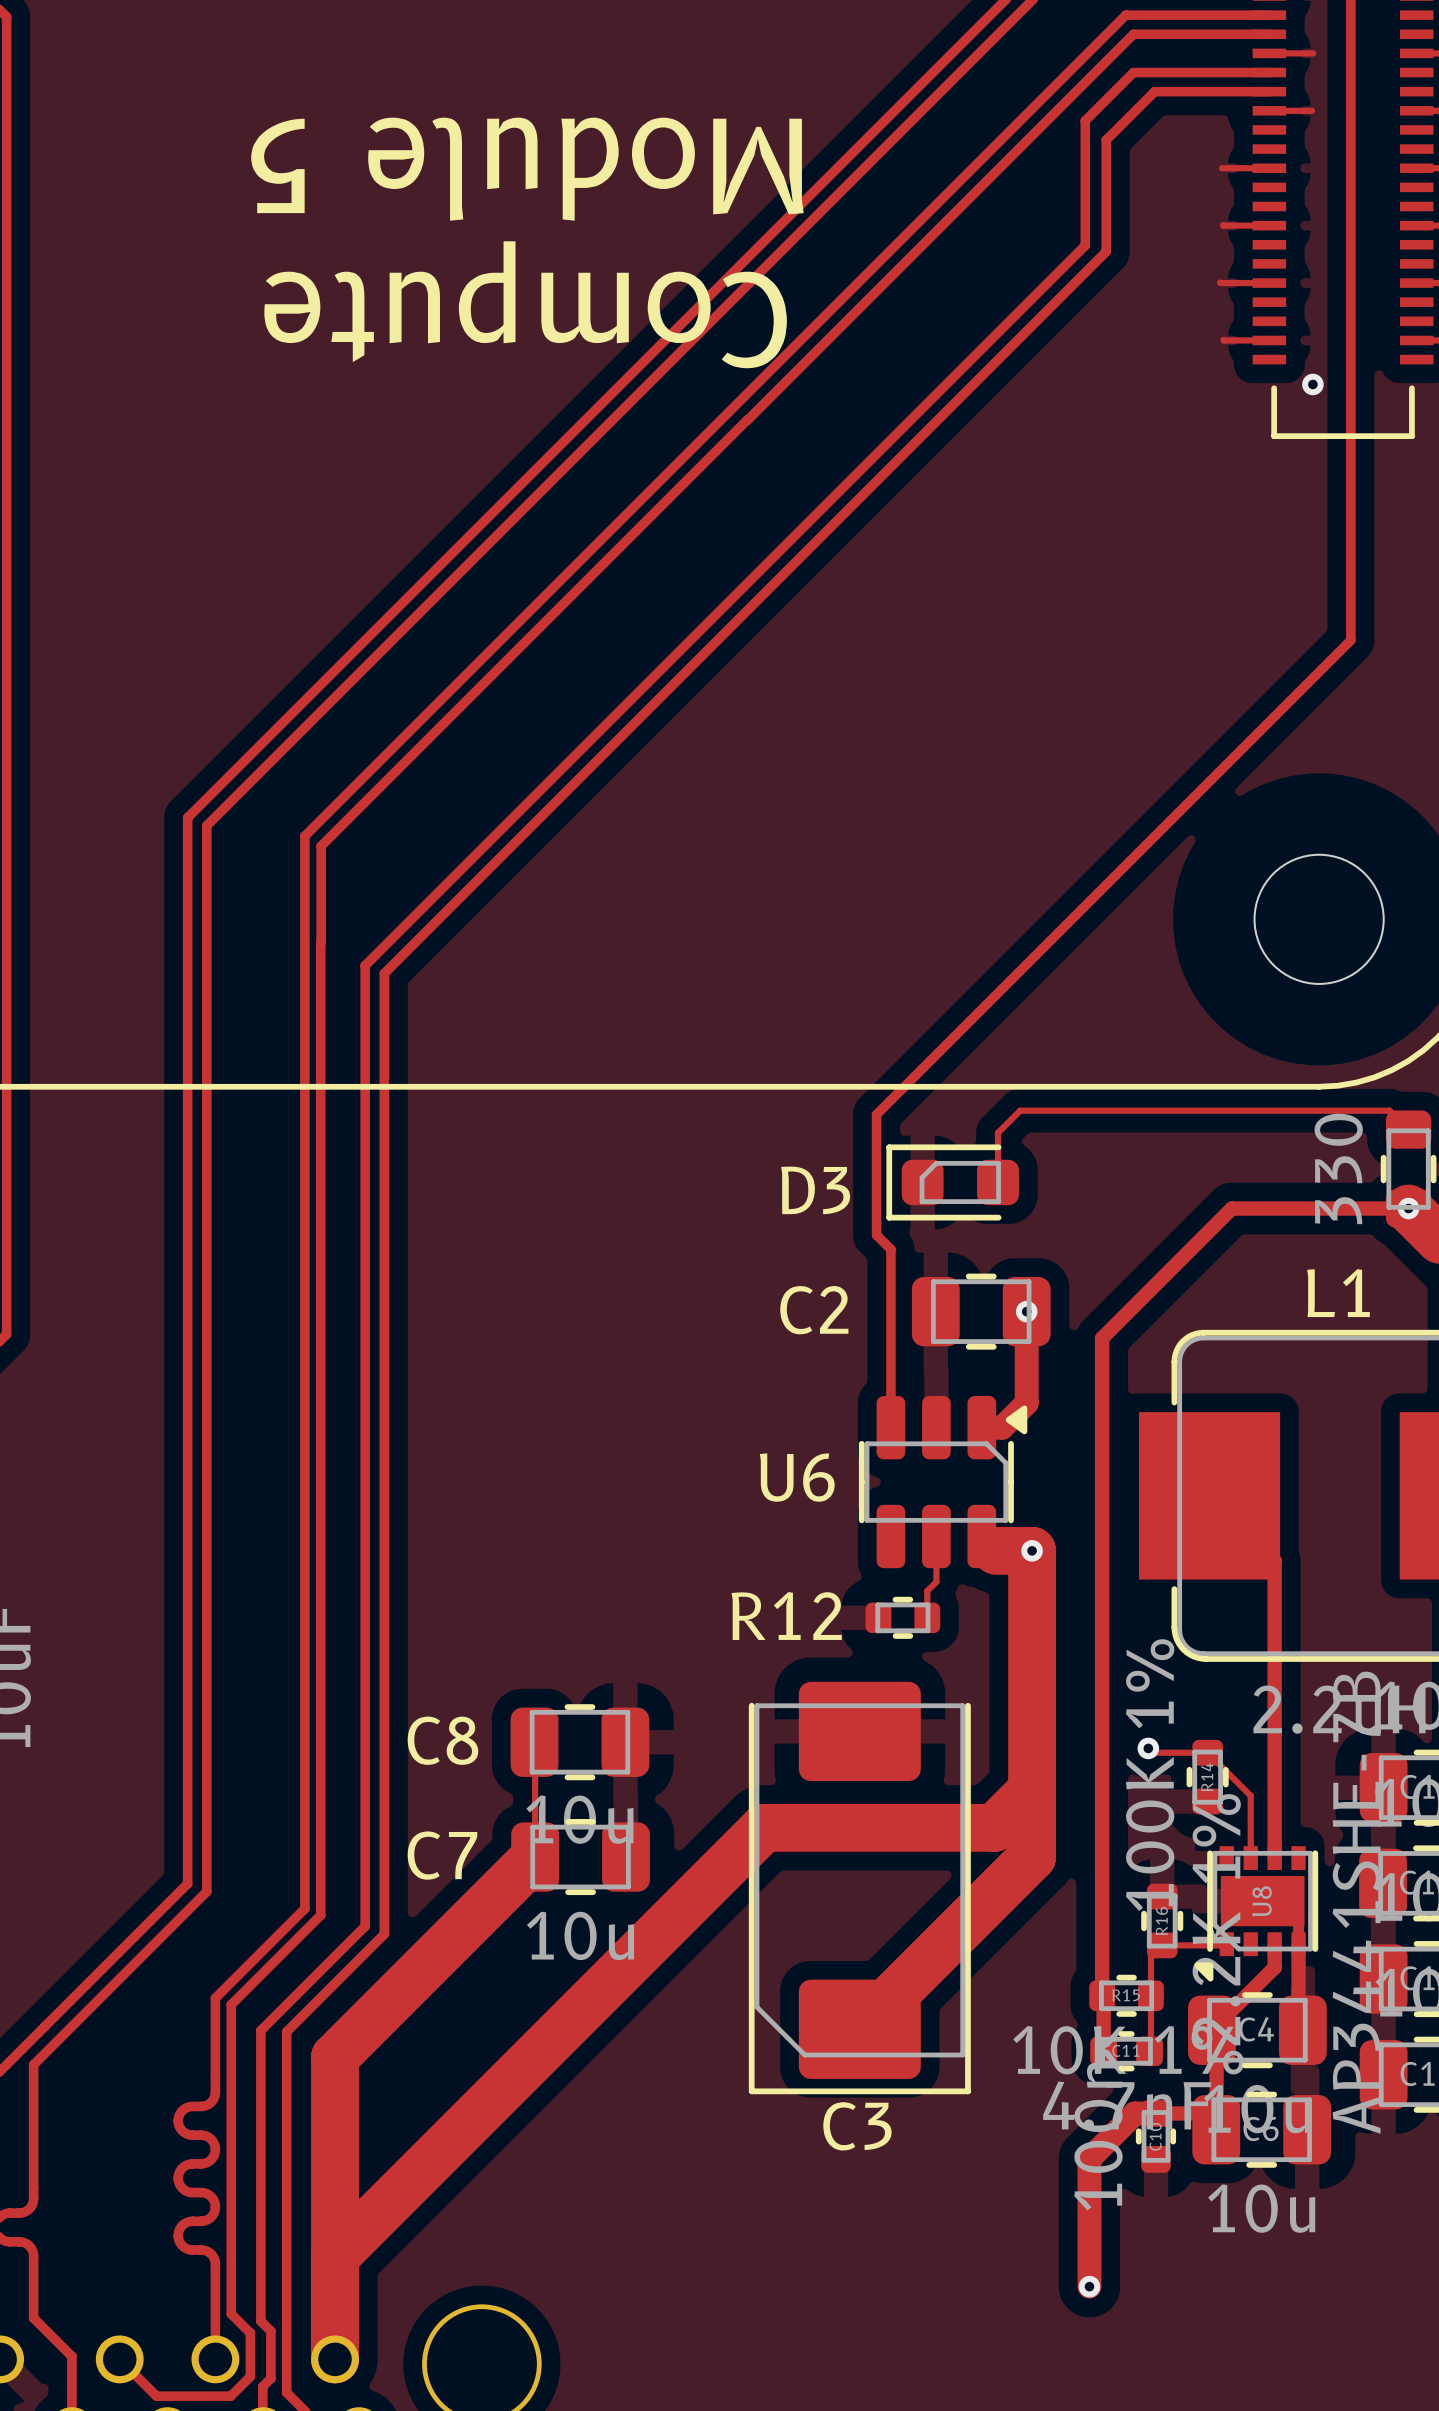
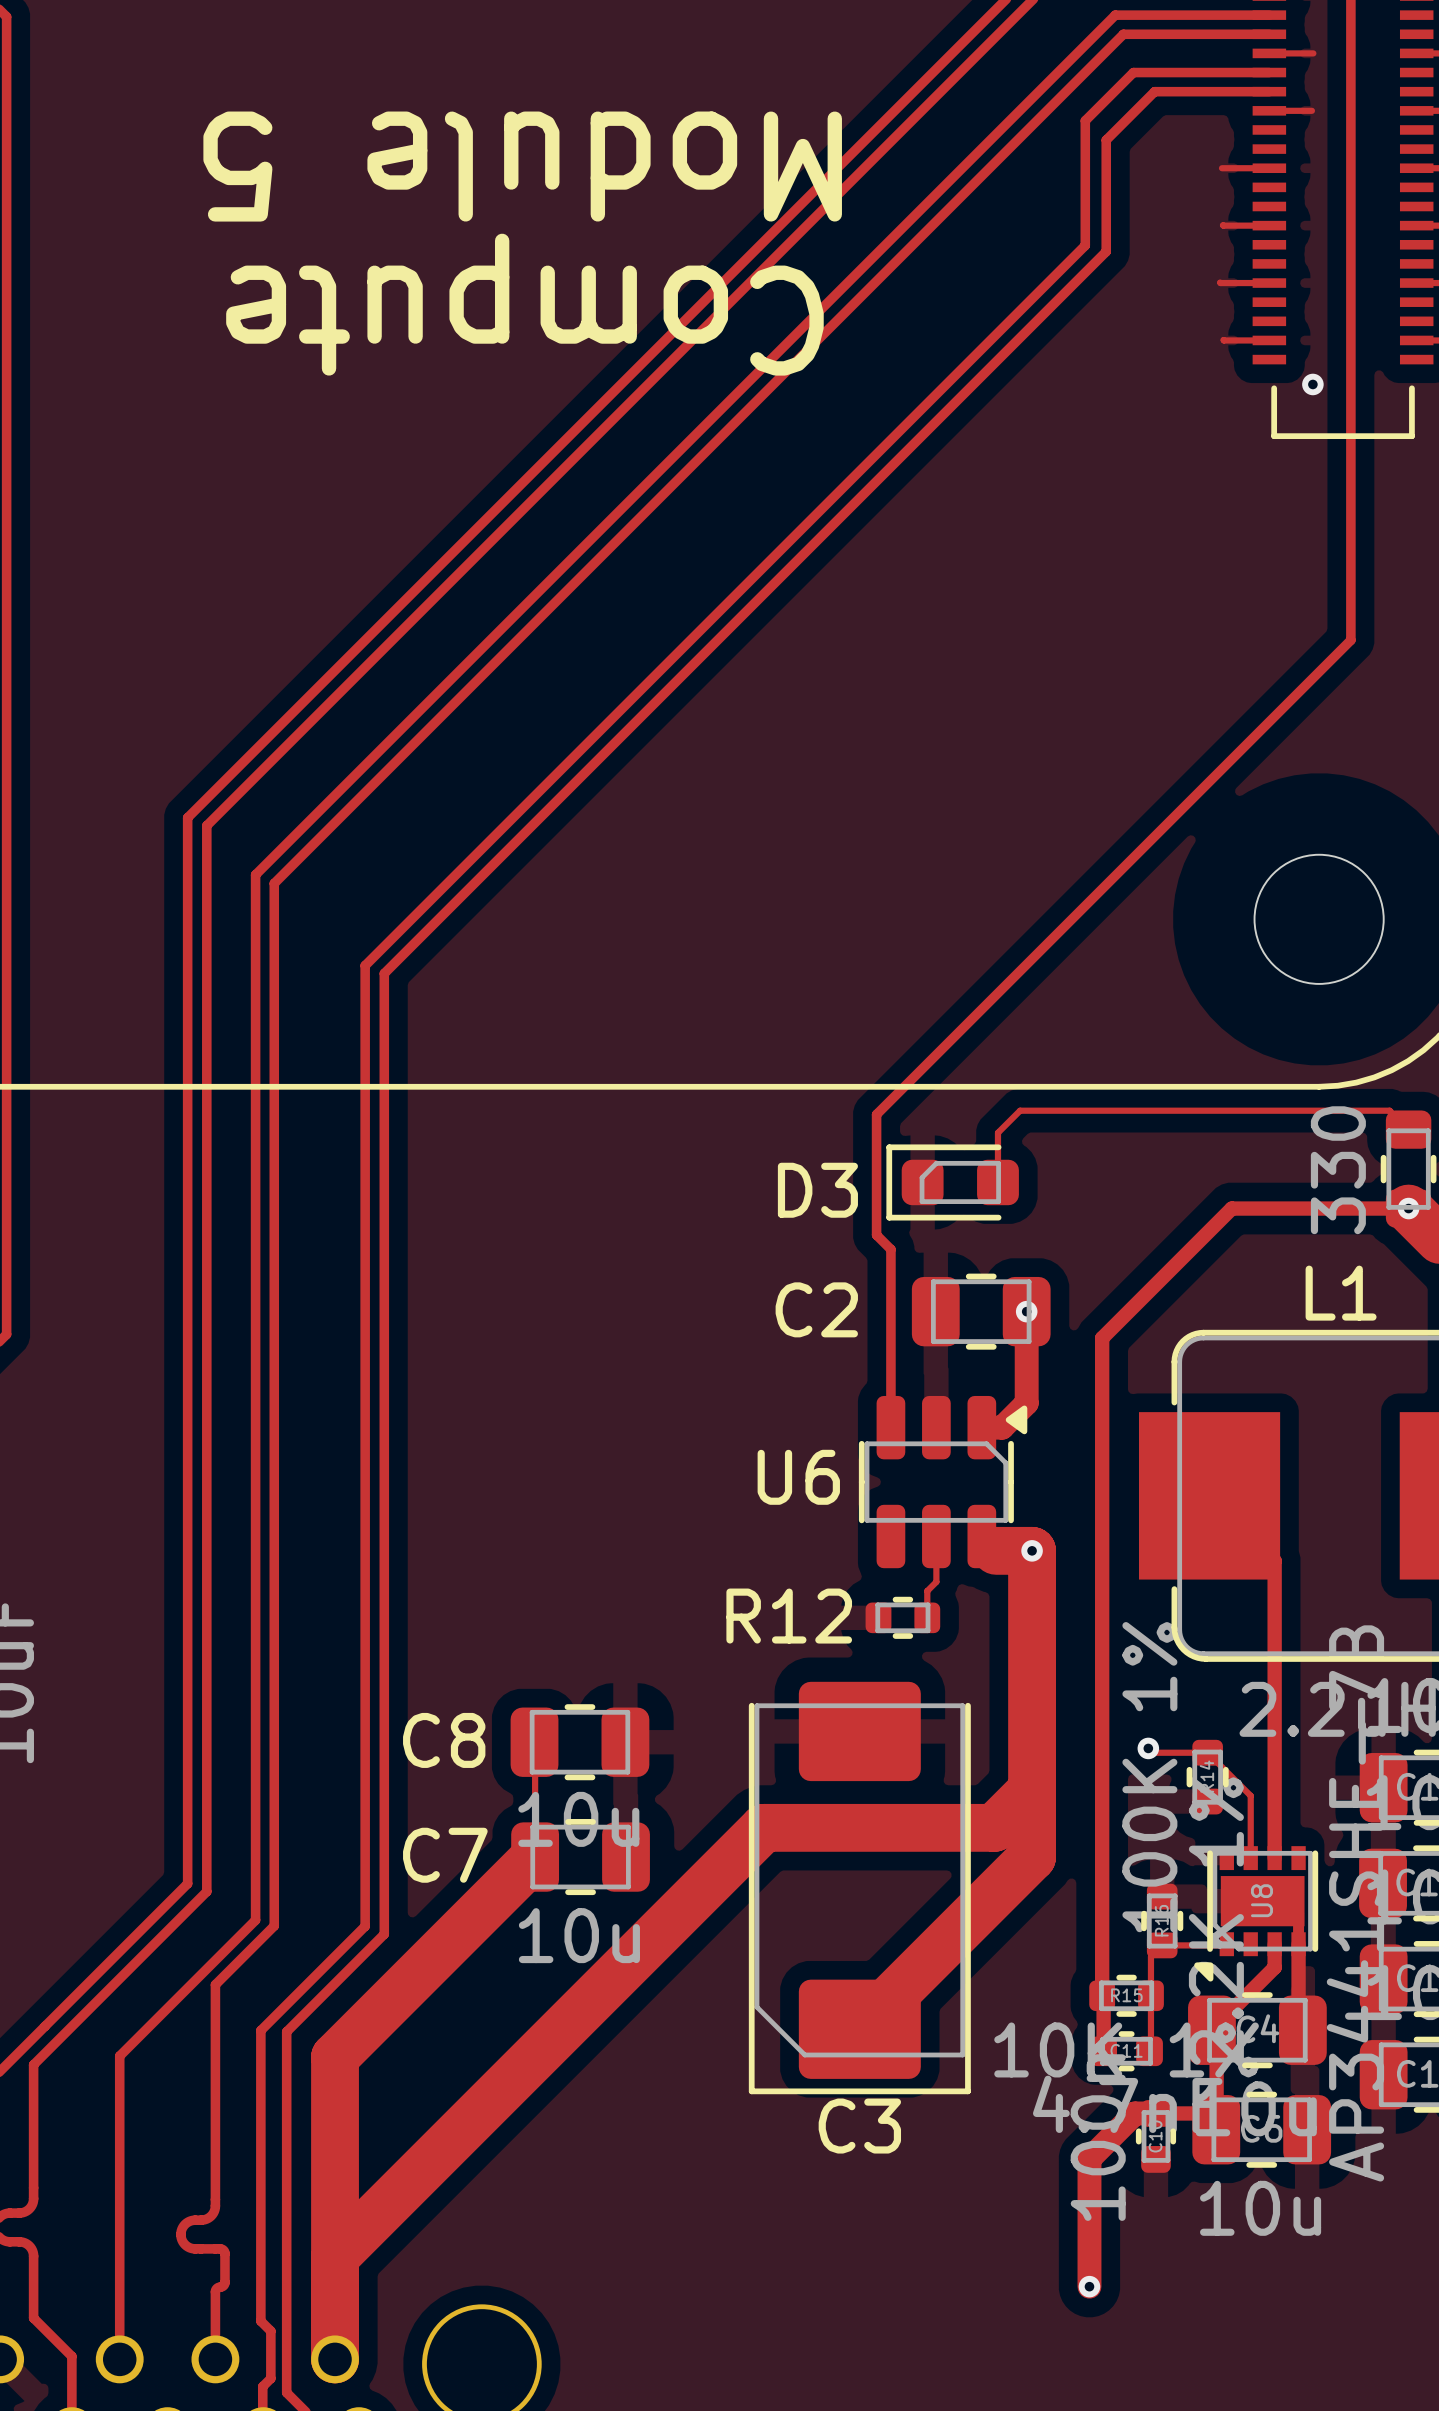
track: (1125, 15) (304, 836) (304, 1908) (215, 1998) -> (1133, 34) (1123, 34) (274, 883) (274, 1925) (215, 1984) (215, 1998)
track: (1133, 34) (747, 419) -> none
track: (747, 419) (321, 846) (321, 942) -> none
track: (320, 942) (320, 1915) (231, 2004) (231, 2313) (250, 2333) (250, 2376) (230, 2396) (156, 2396) (119, 2359) -> (1125, 15) (1115, 15) (255, 874) (255, 1920) (119, 2056) (119, 2359)
track: (215, 2092) (209, 2103) (185, 2108) (180, 2113) (178, 2120) (180, 2127) (185, 2133) (204, 2135) (211, 2139) (215, 2147) (214, 2155) (206, 2162) (185, 2165) (180, 2171) (178, 2178) (183, 2189) (190, 2192) (206, 2193) (214, 2203) (214, 2210) (211, 2217) (204, 2220) (185, 2223) (180, 2228) (178, 2235) (180, 2242) (185, 2248) (204, 2250) (213, 2257) (215, 2264) (215, 2291) -> (215, 2092) (214, 2209) (206, 2219) (186, 2223) (180, 2234) (182, 2241) (189, 2247) (220, 2248) (224, 2251) (224, 2283) (216, 2288) (215, 2291)

